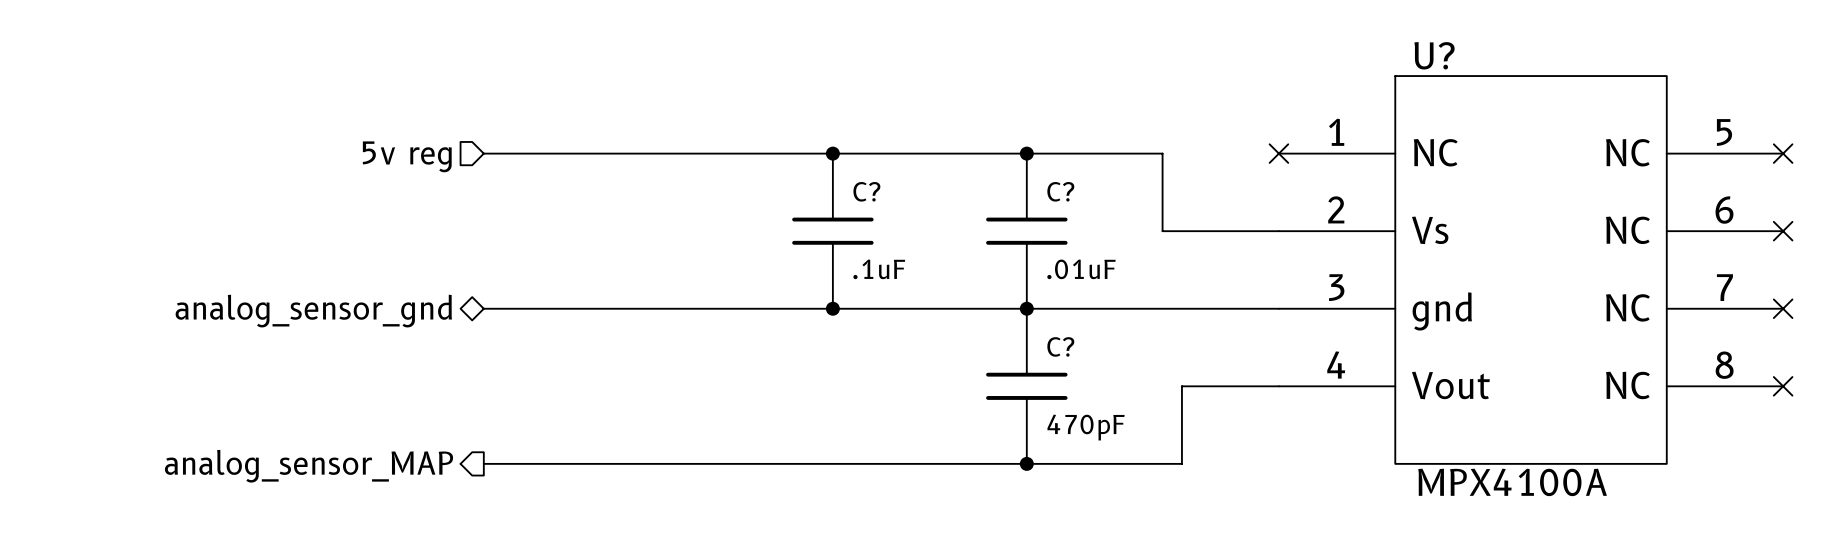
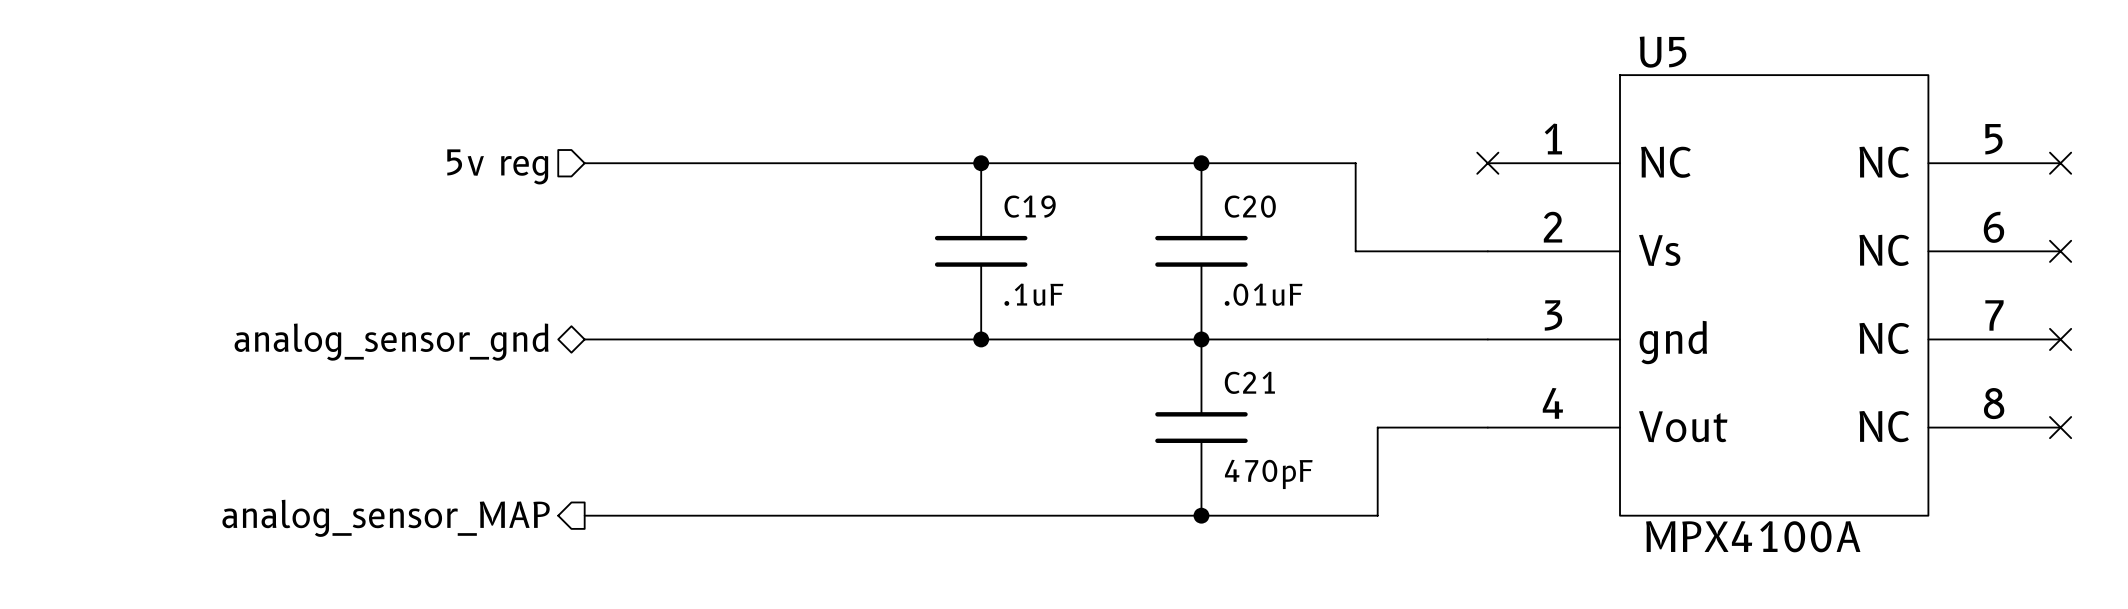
U? name: U? (1434, 55) -> U5 (1663, 52)
C? name: C? (866, 191) -> C19 (1030, 206)
C? name: C? (1060, 191) -> C20 (1250, 206)
C? name: C? (1060, 346) -> C21 (1249, 382)

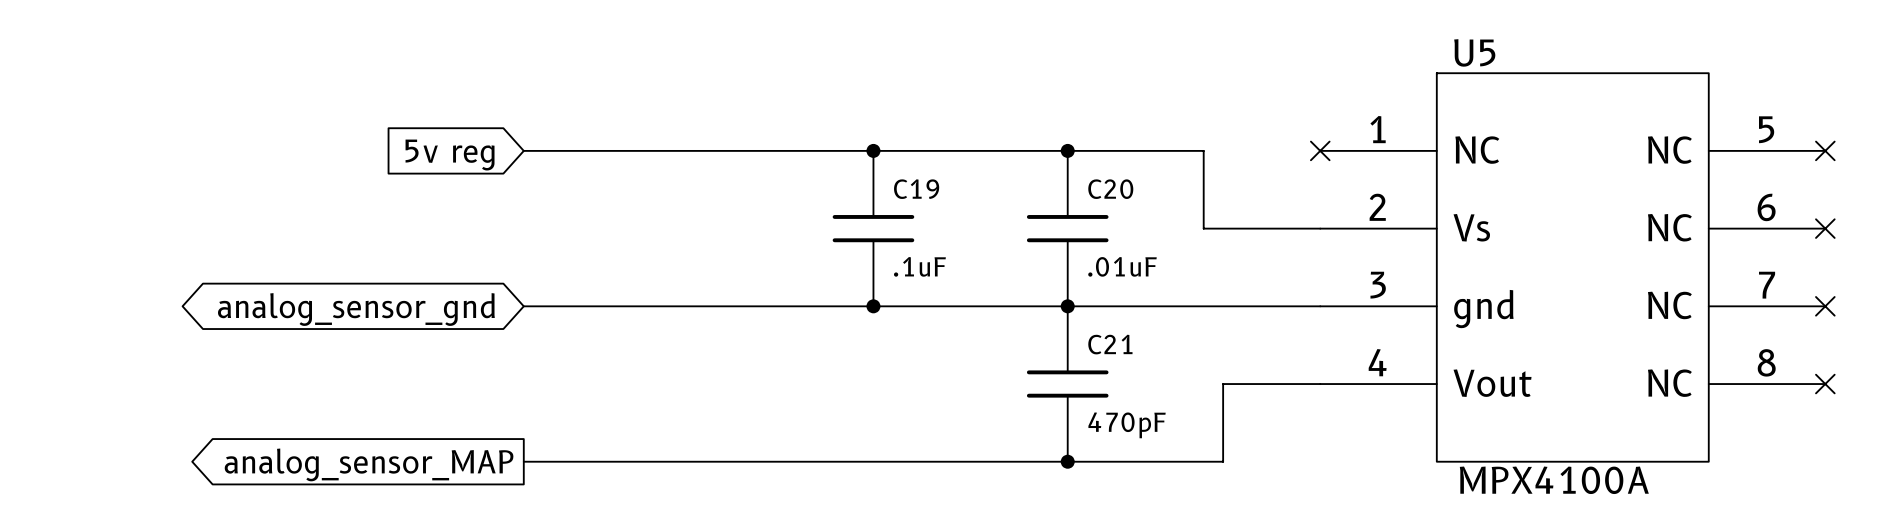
hierarchical label: 5v reg (497, 166) -> none
global label: none -> 5v reg (450, 155)
hierarchical label: analog_sensor_gnd (391, 342) -> none
global label: none -> analog_sensor_gnd (356, 309)
hierarchical label: analog_sensor_MAP (386, 518) -> none
global label: none -> analog_sensor_MAP (369, 464)

